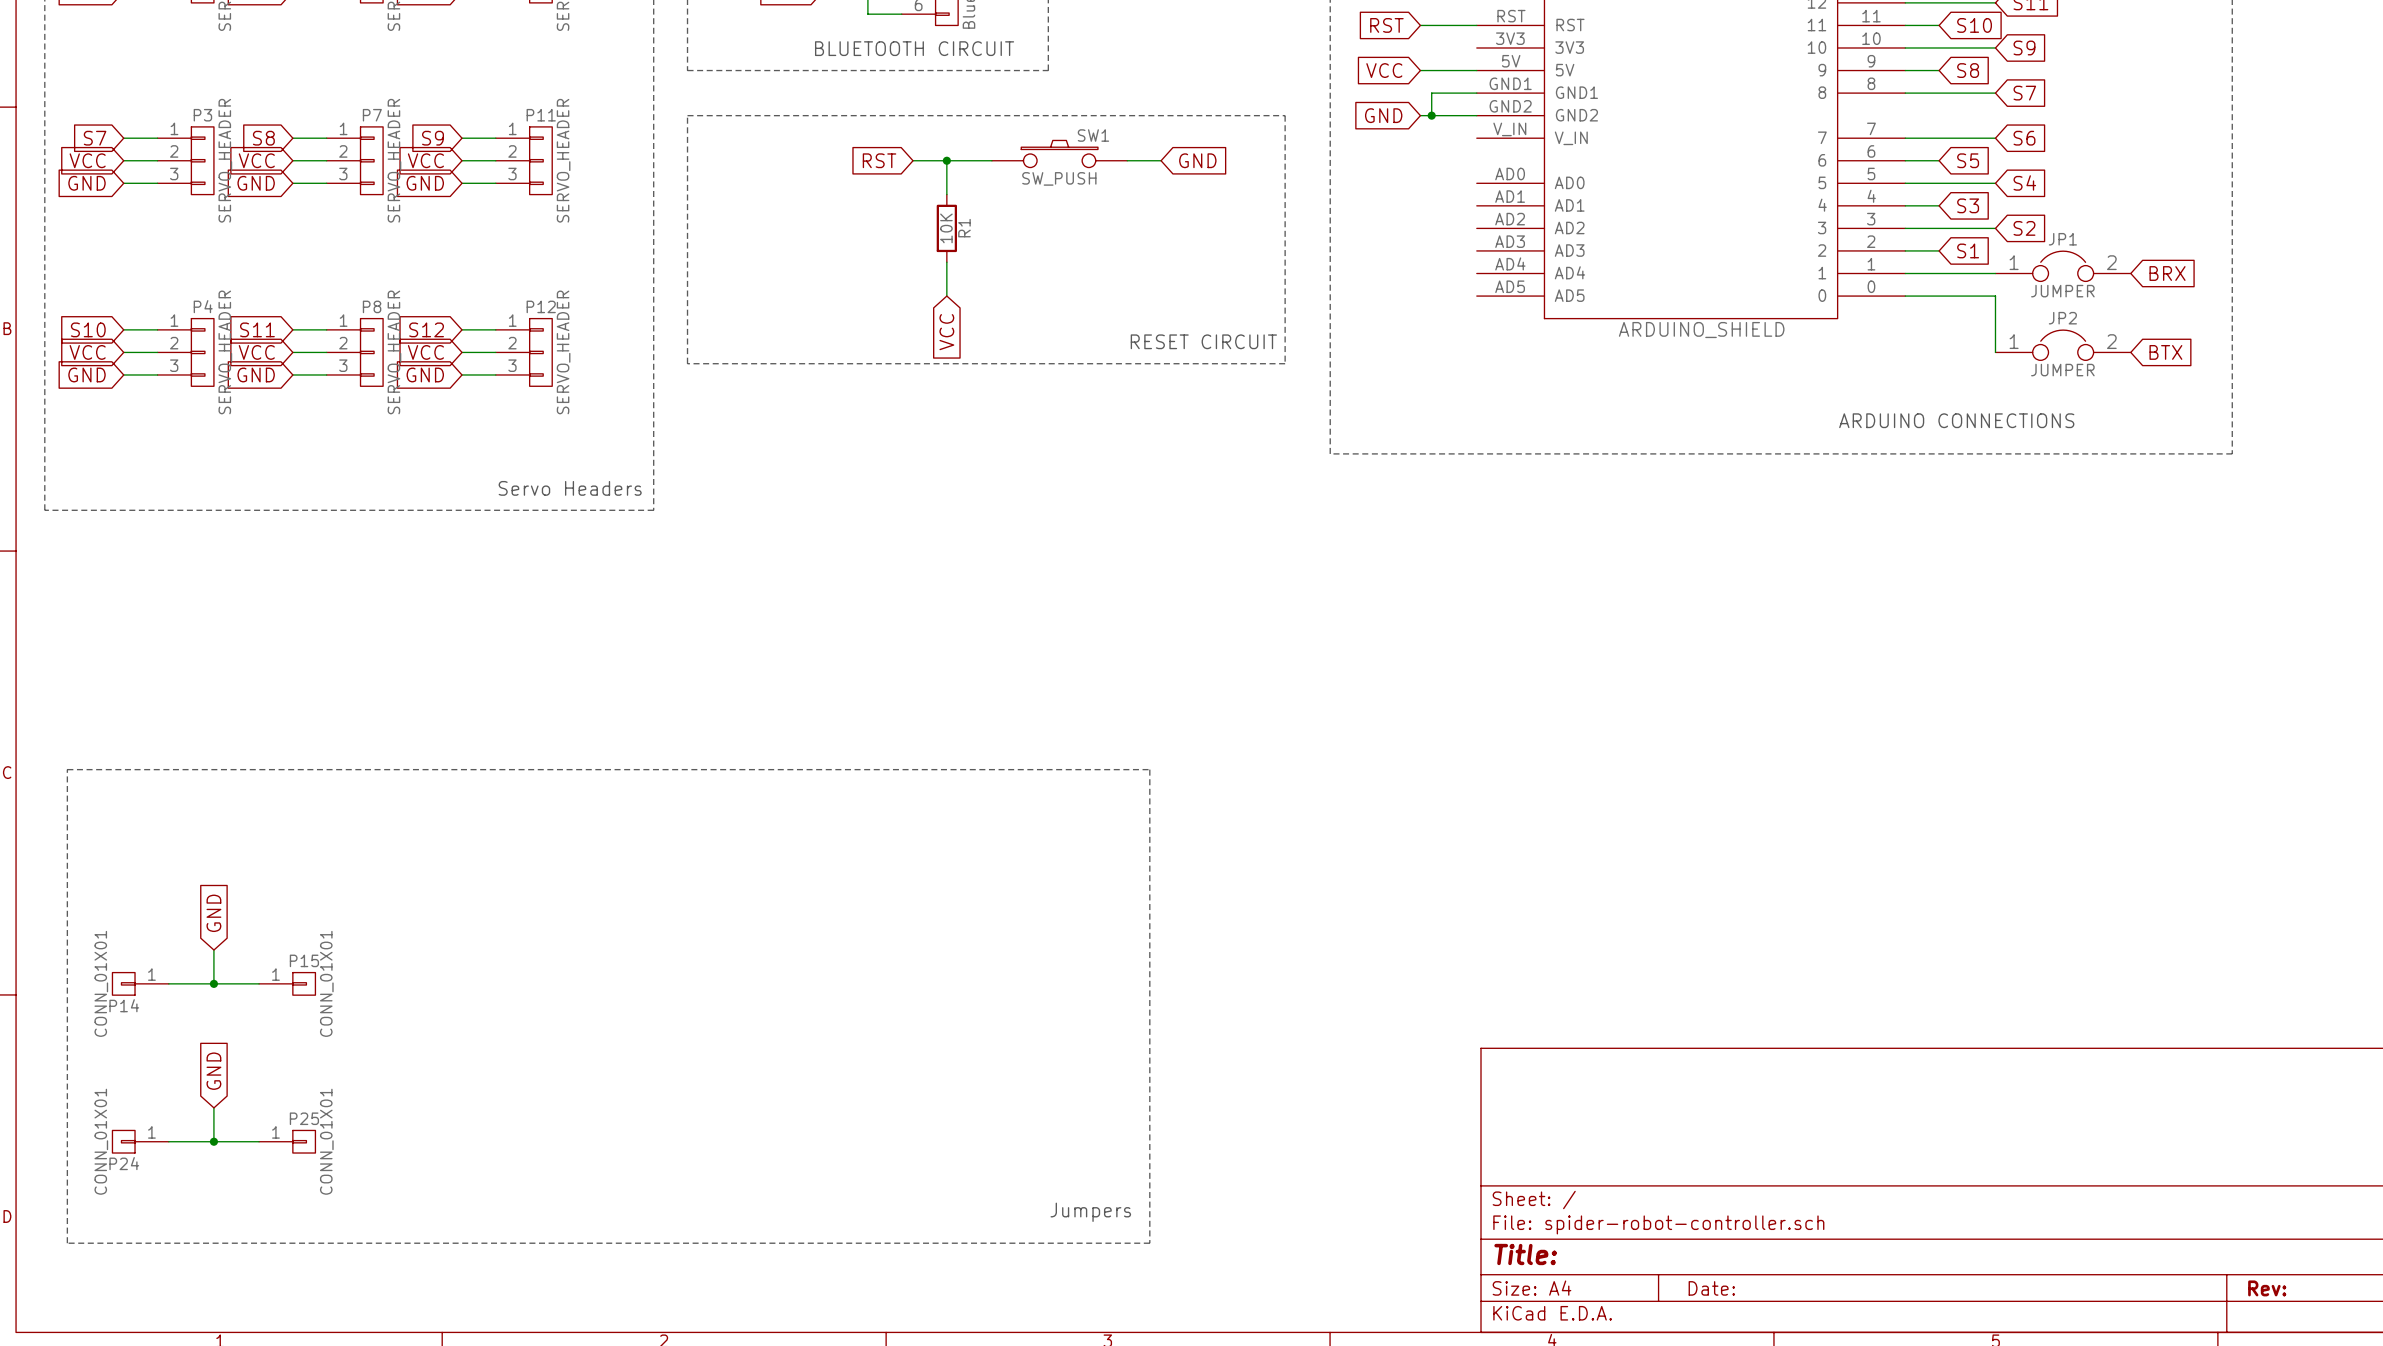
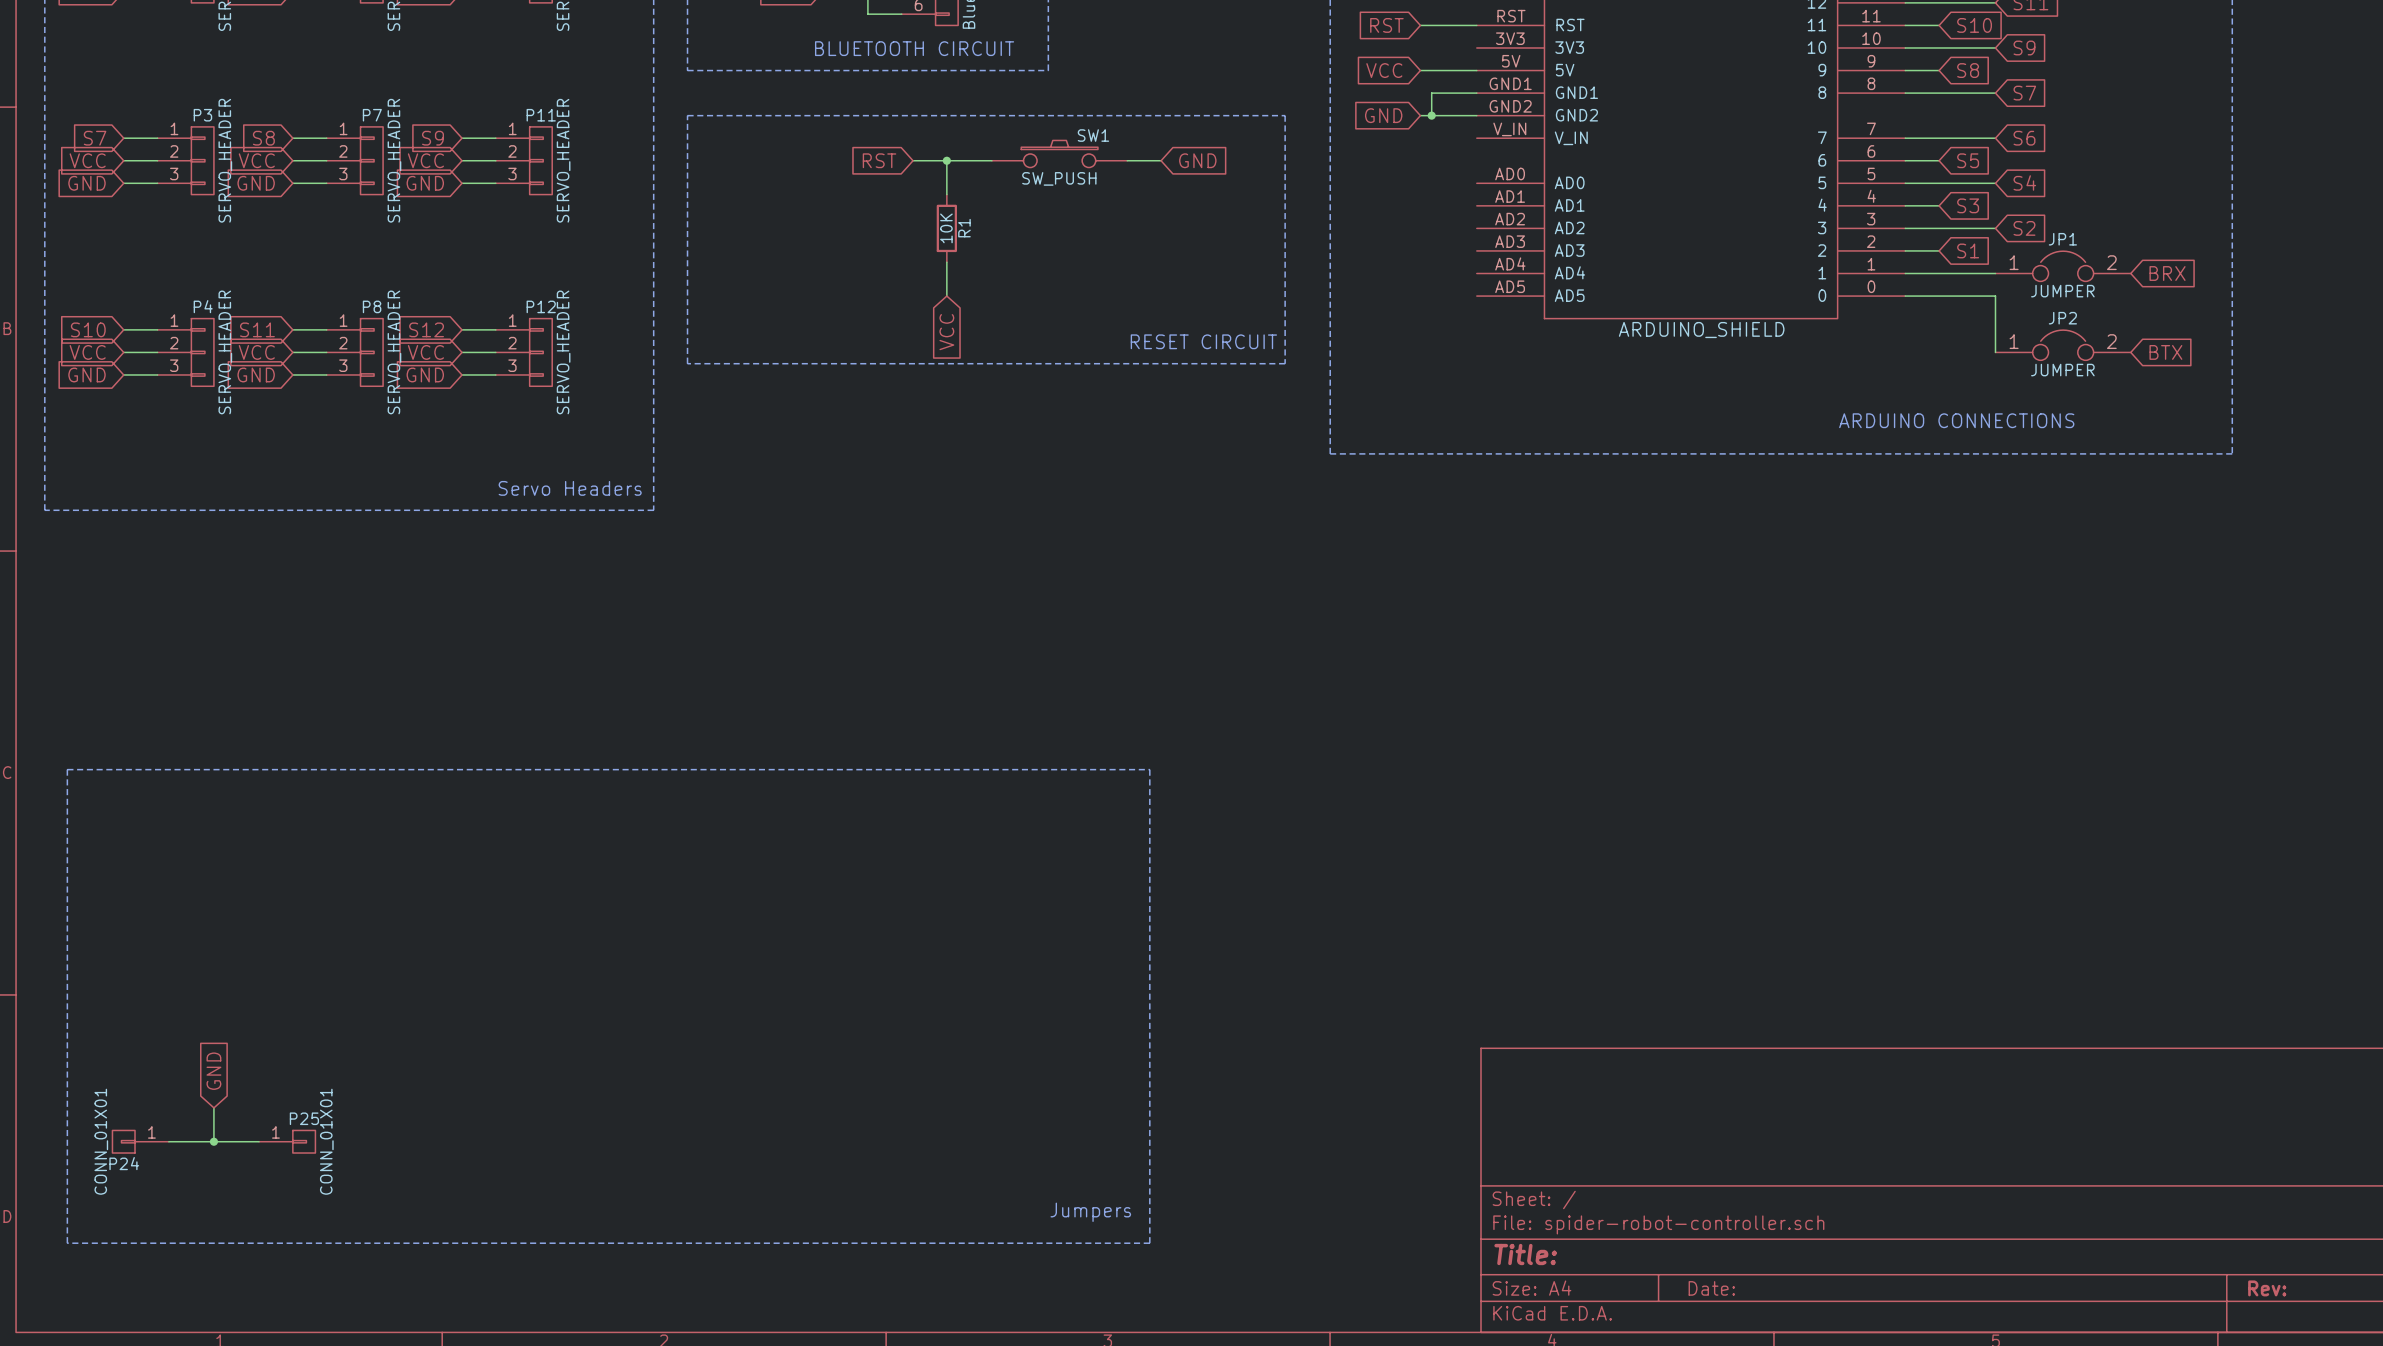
global label: GND (213, 913) -> none
wire: (213, 950) (213, 983) -> none
P14: CONN_01X01 (140, 983) -> none
wire: (168, 983) (259, 983) -> none
junction: (213, 983) -> none
P15: CONN_01X01 (287, 983) -> none

